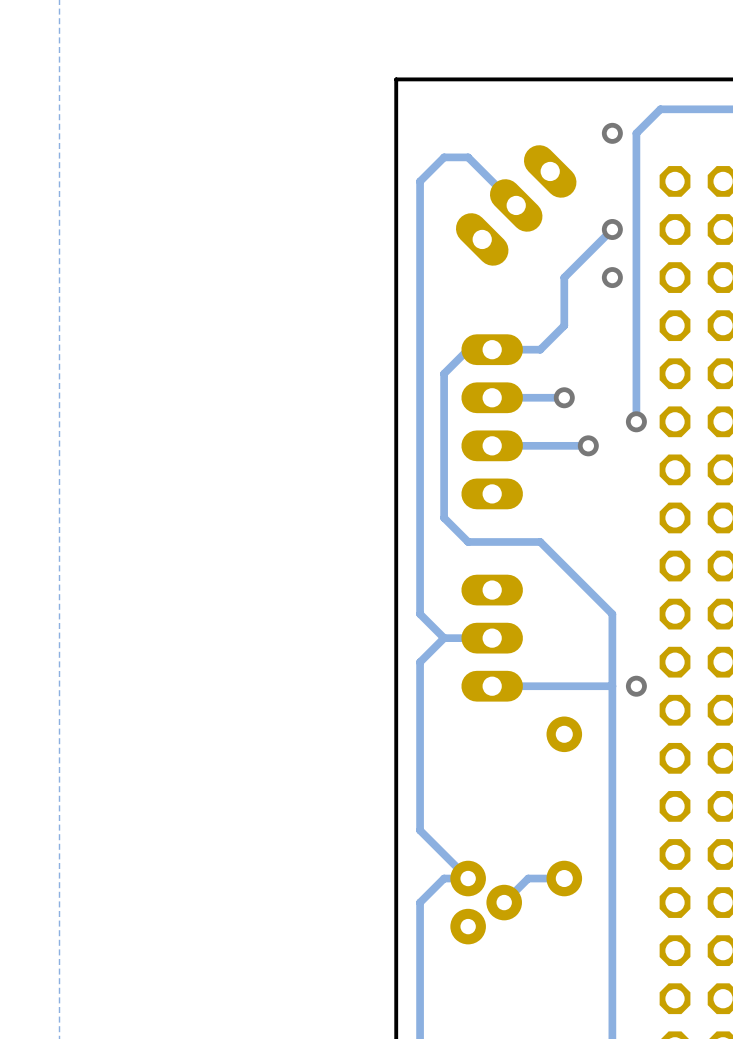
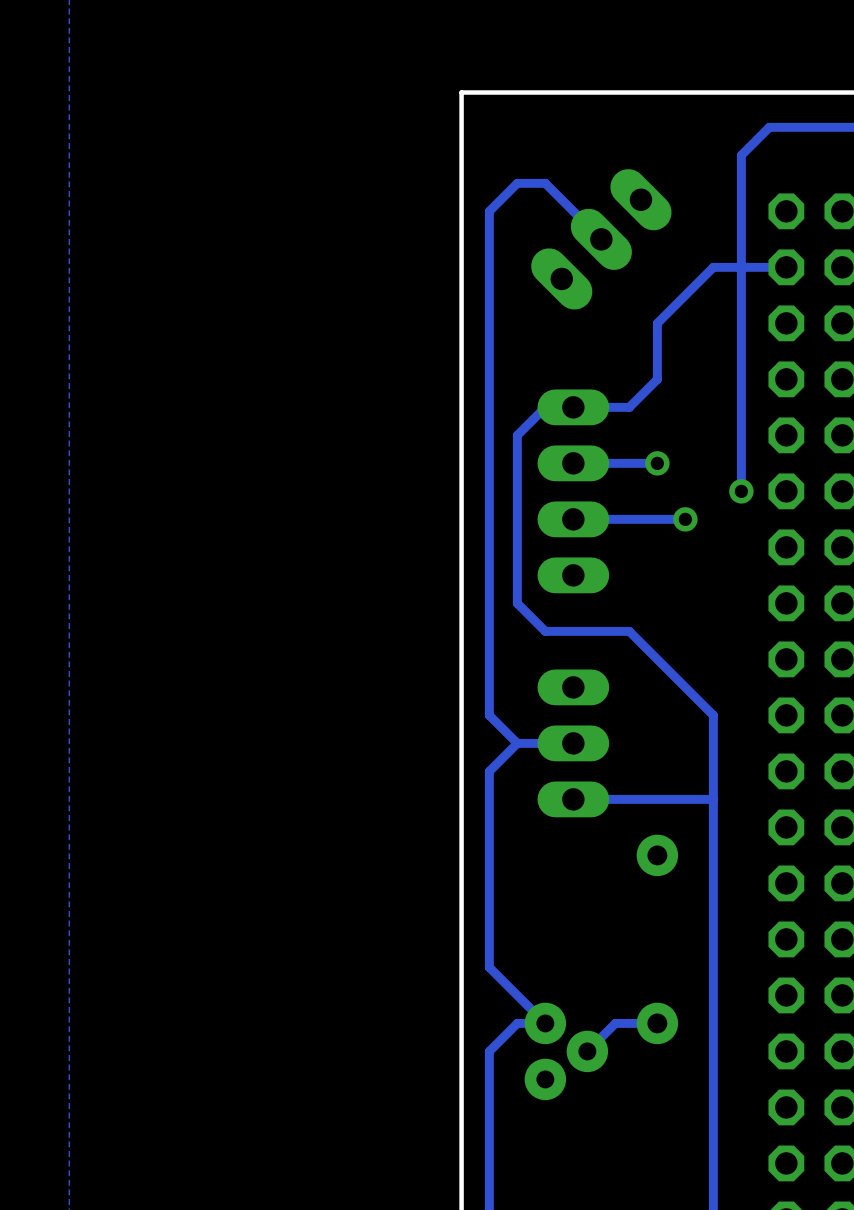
via: (612, 133) -> none
via: (612, 229) -> none
track: none -> (786, 267) (713, 267)
via: (612, 277) -> none
via: (636, 686) -> none

